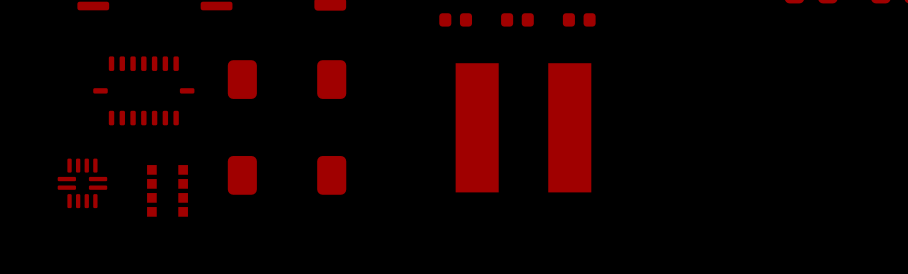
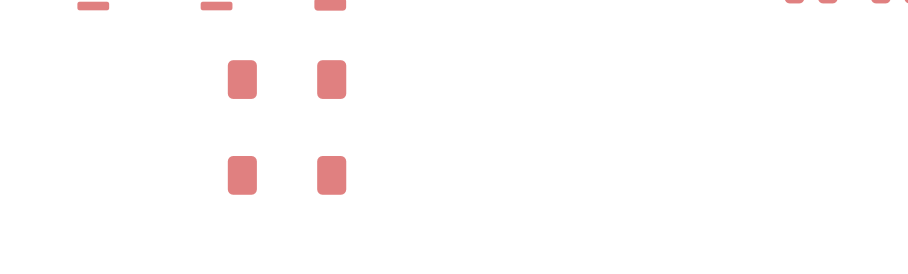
part: (455, 19) -> none
part: (517, 19) -> none
part: (579, 19) -> none
part: (143, 90) -> none
part: (523, 127) -> none
part: (82, 183) -> none
part: (167, 190) -> none

